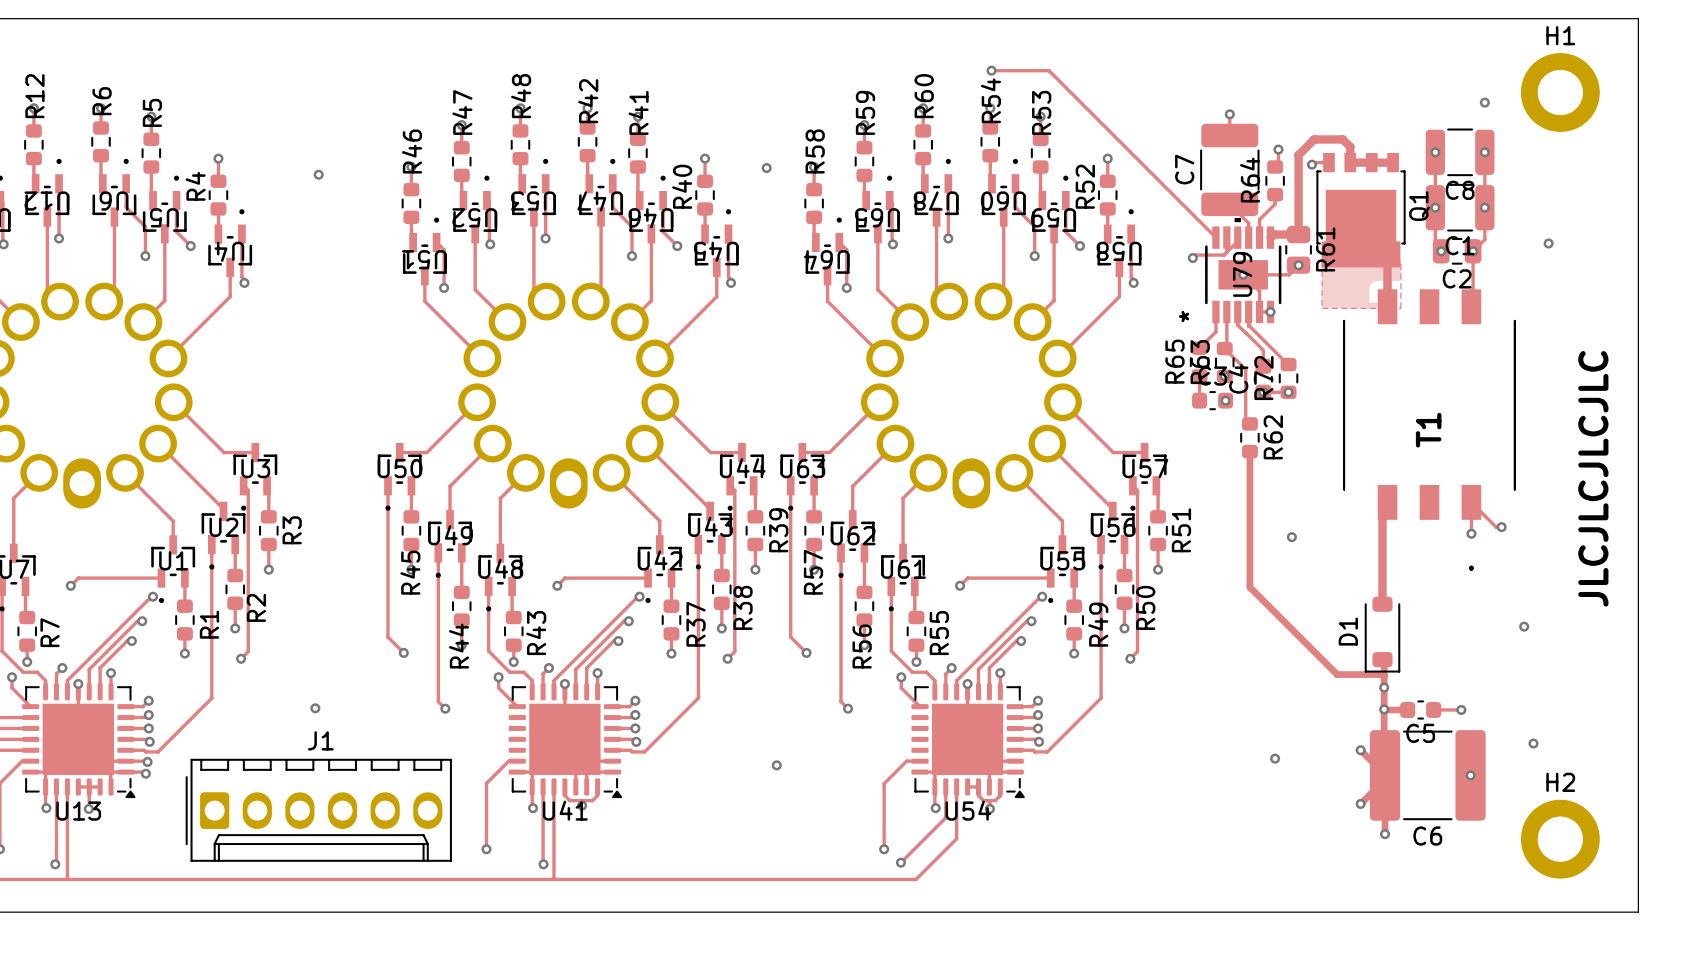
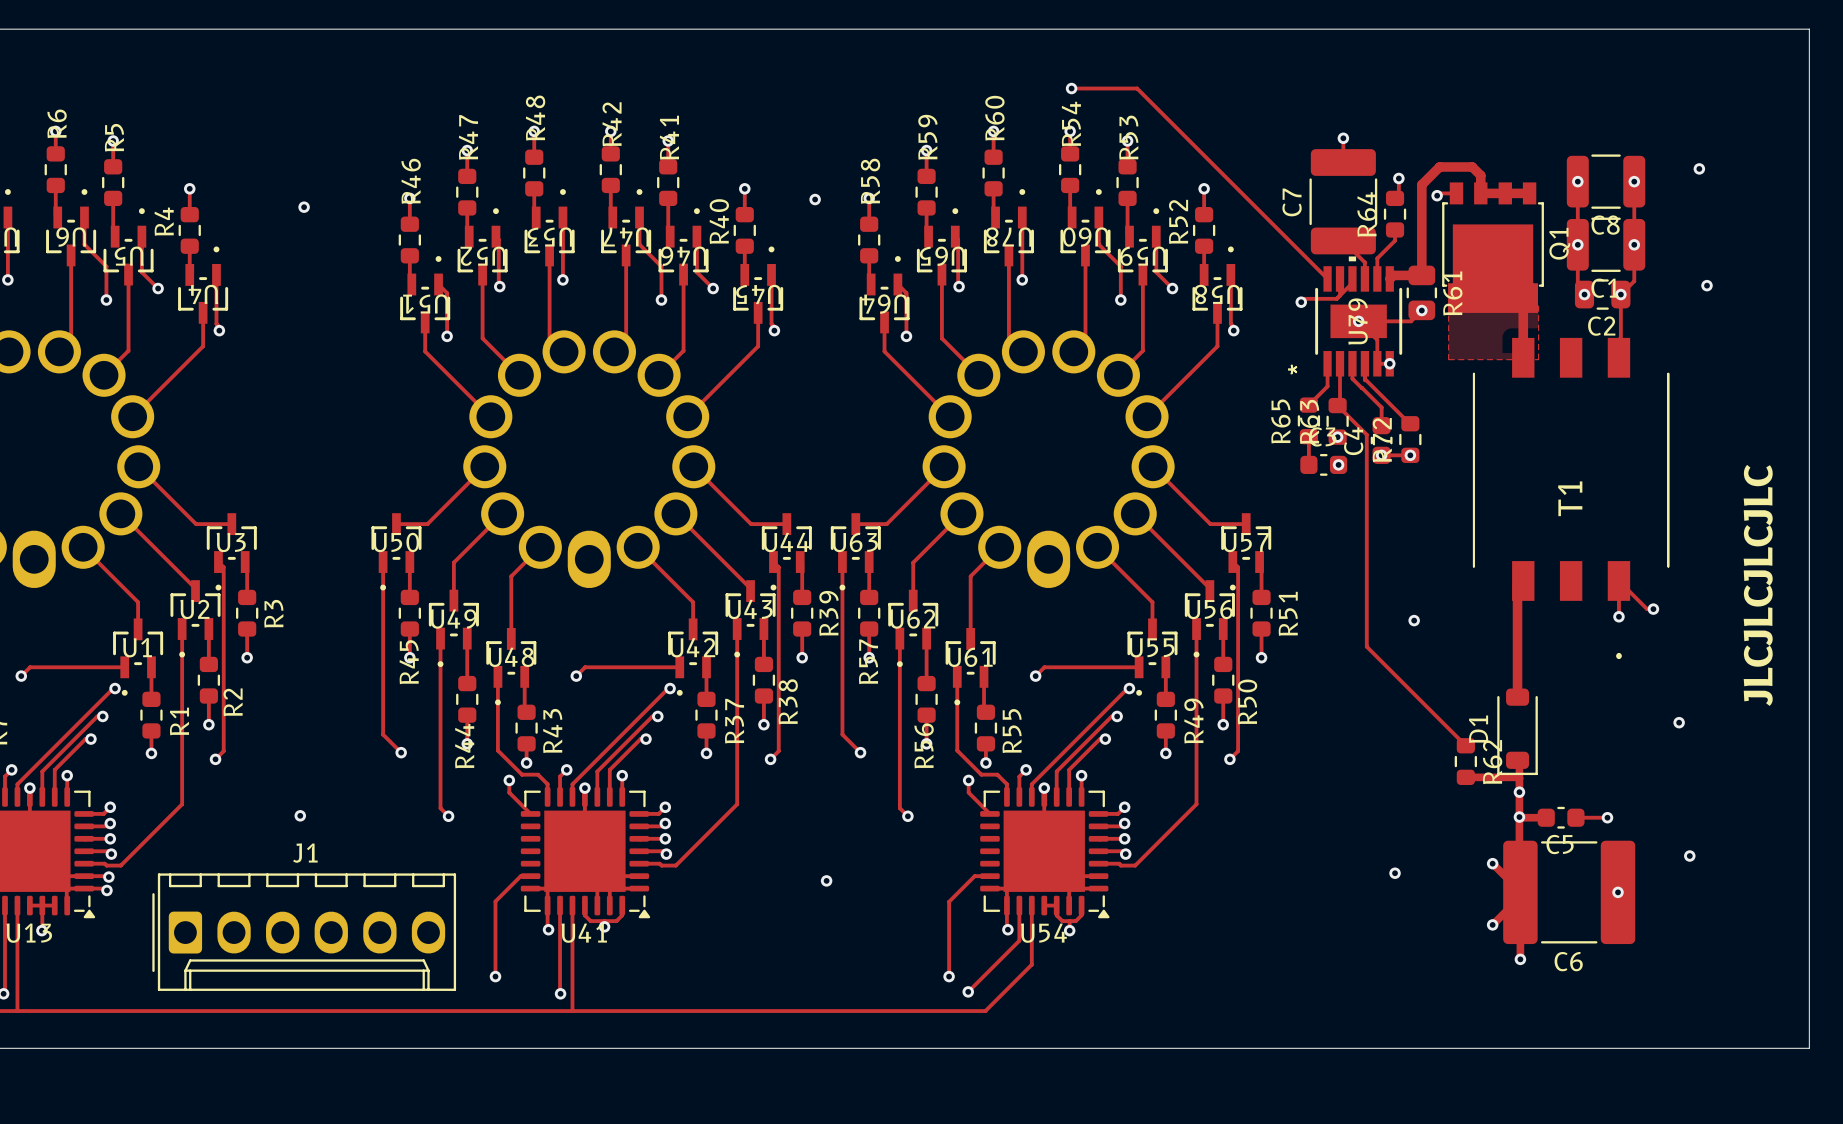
H1: (1560, 92) -> none
via position: (1484, 102) -> (1699, 168)
track: (1245, 369) (1245, 419) (1249, 423) -> (1361, 429) (1366, 434) (1366, 646) (1465, 745)
R62 position: (1249, 437) -> (1465, 761)
track: (1249, 451) (1249, 587) (1337, 674) -> none
H2: (1560, 839) -> none

